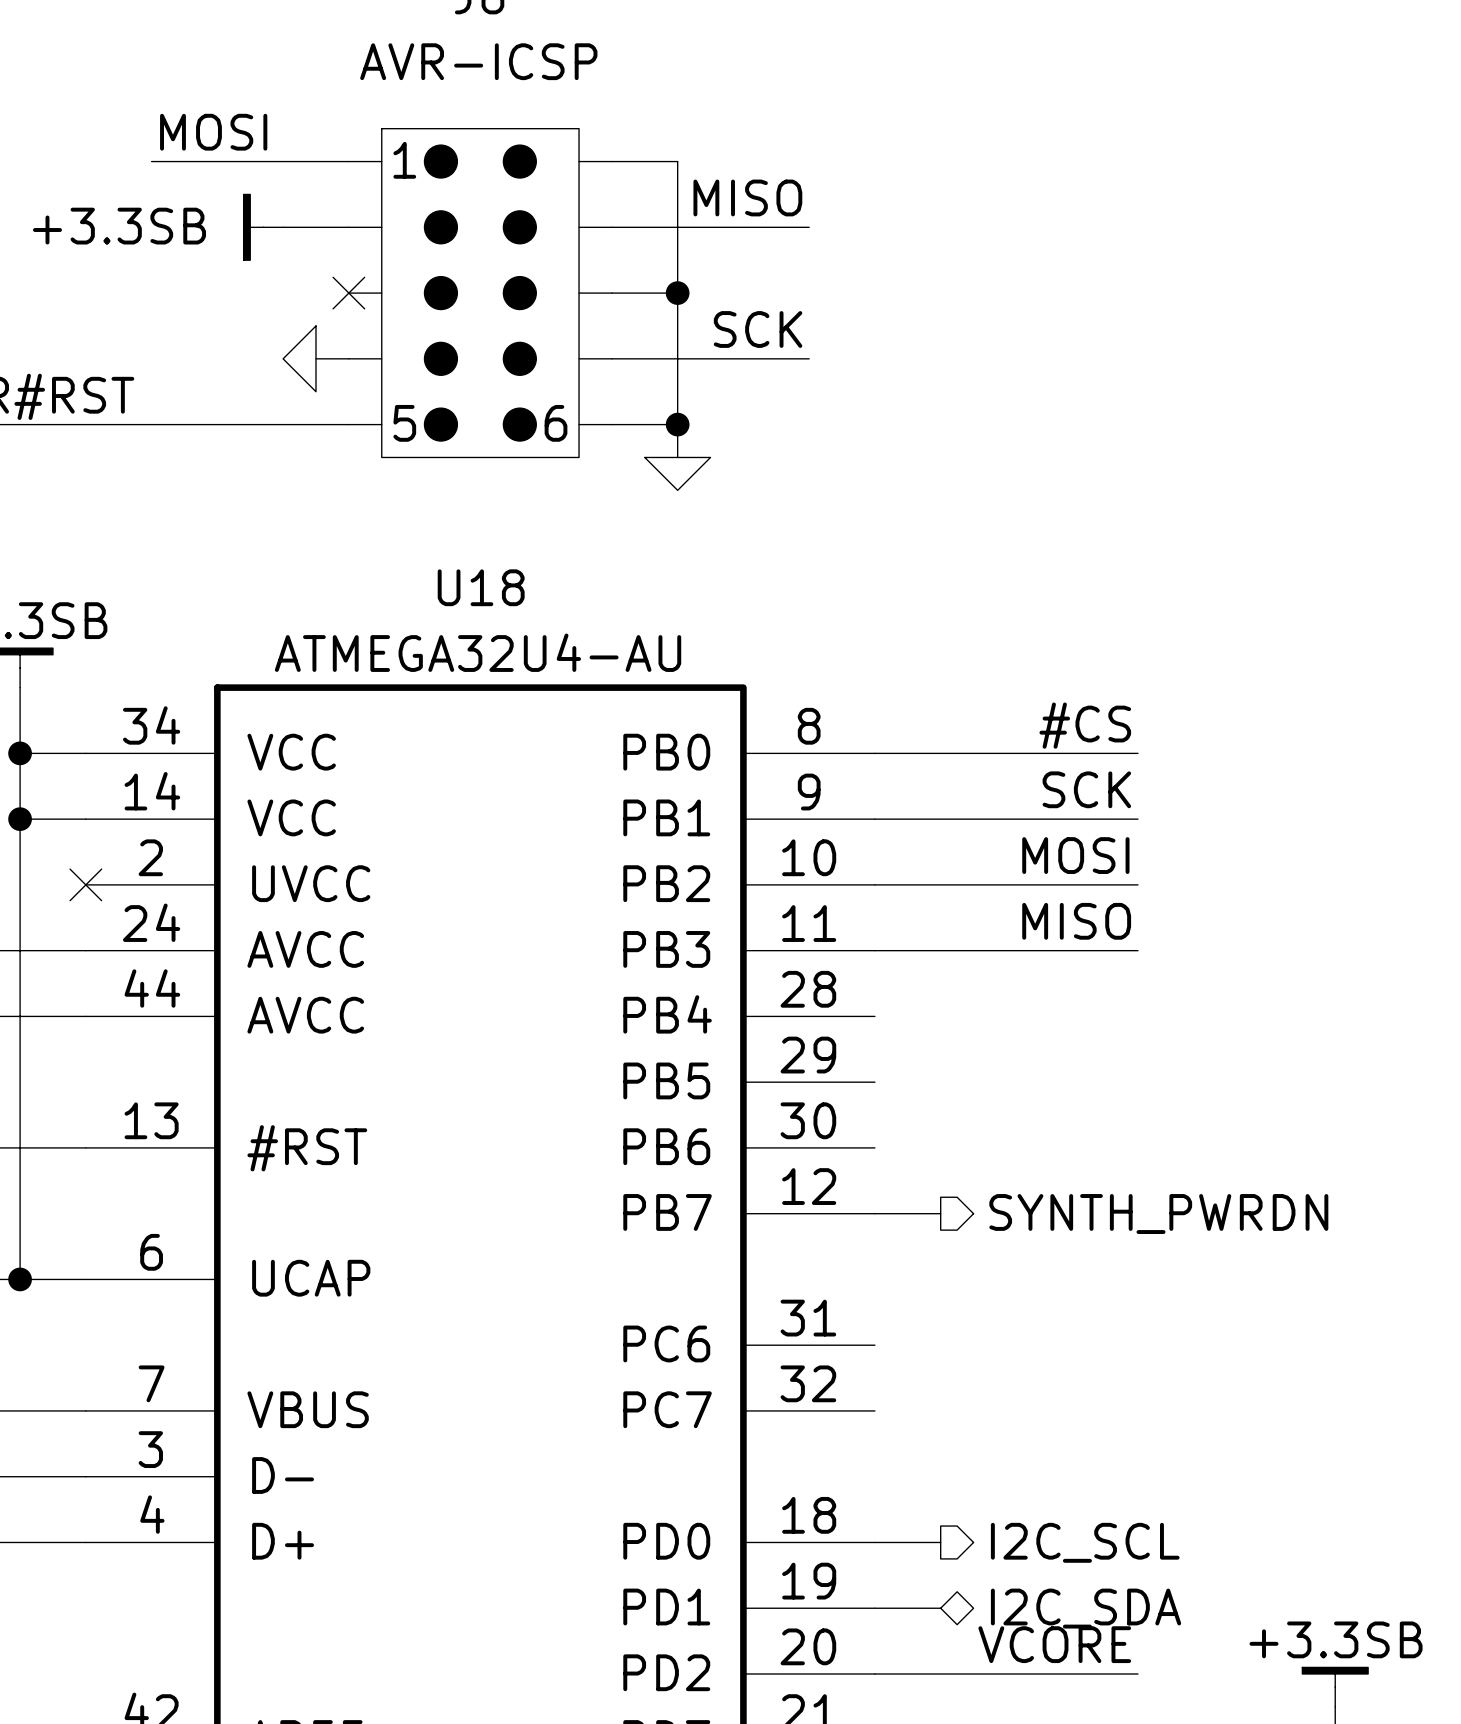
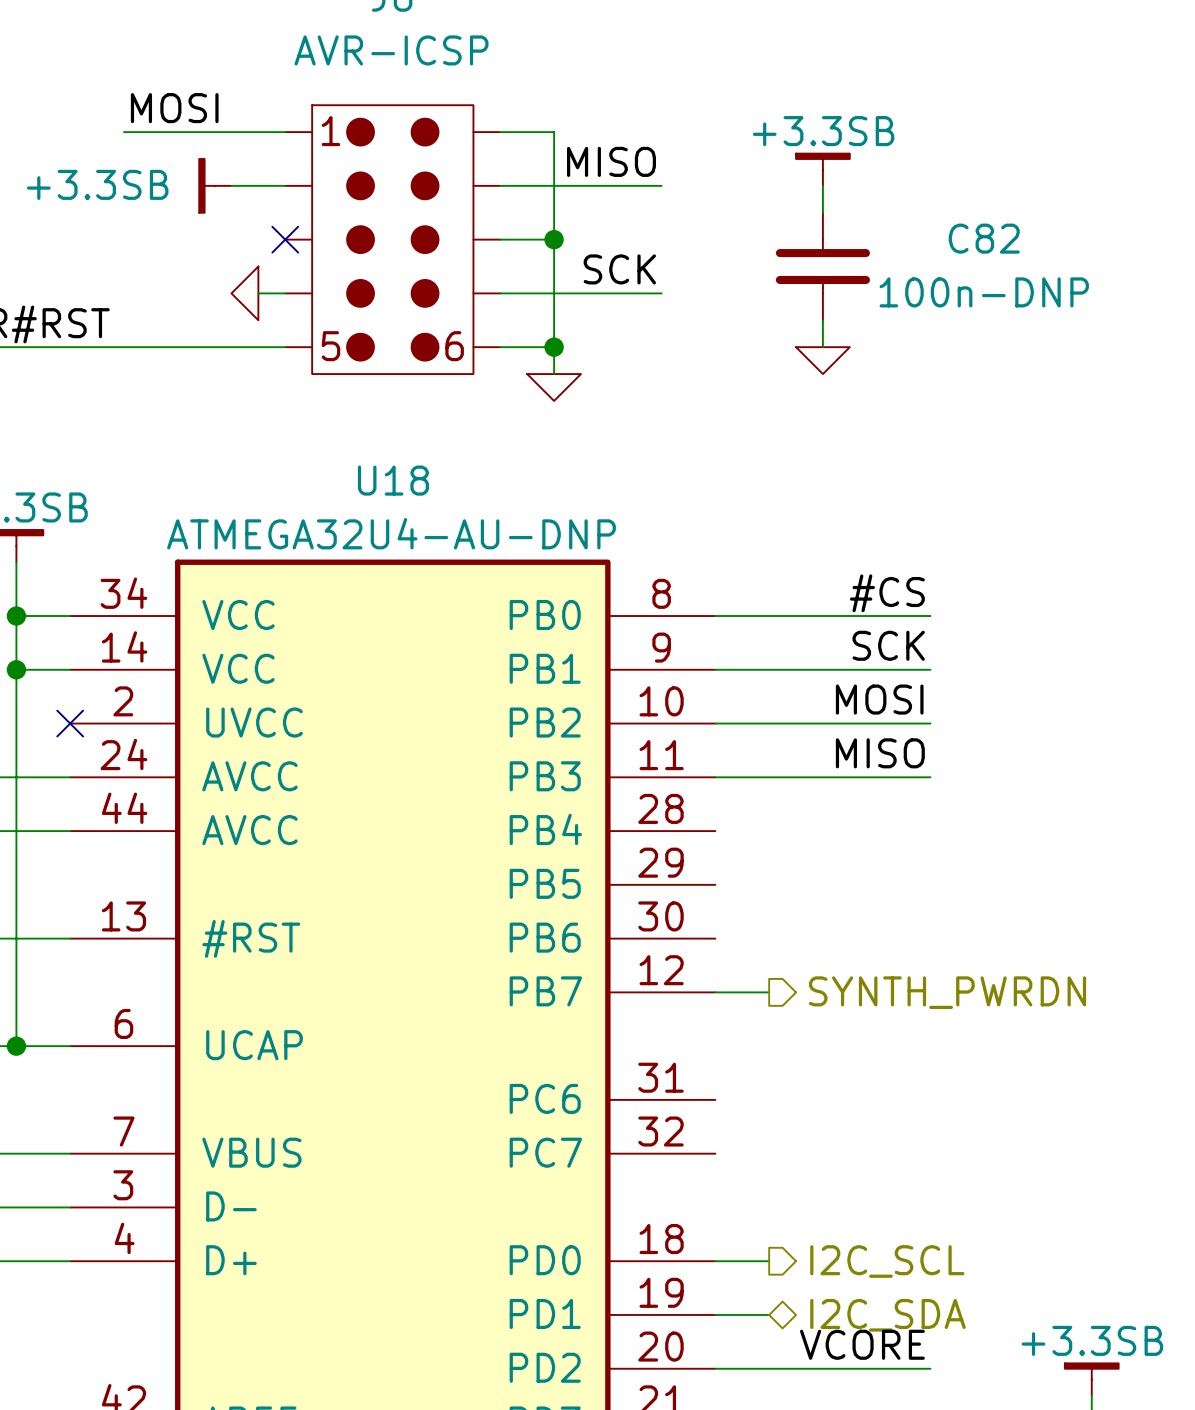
power symbol: none -> +3.3SB (822, 169)
wire: none -> (822, 185) (822, 212)
C82: none -> 100n-DNP (822, 266)
wire: none -> (822, 320) (822, 347)
power symbol: none -> (822, 360)
U18 value: ATMEGA32U4-AU (478, 652) -> ATMEGA32U4-AU-DNP (391, 533)

